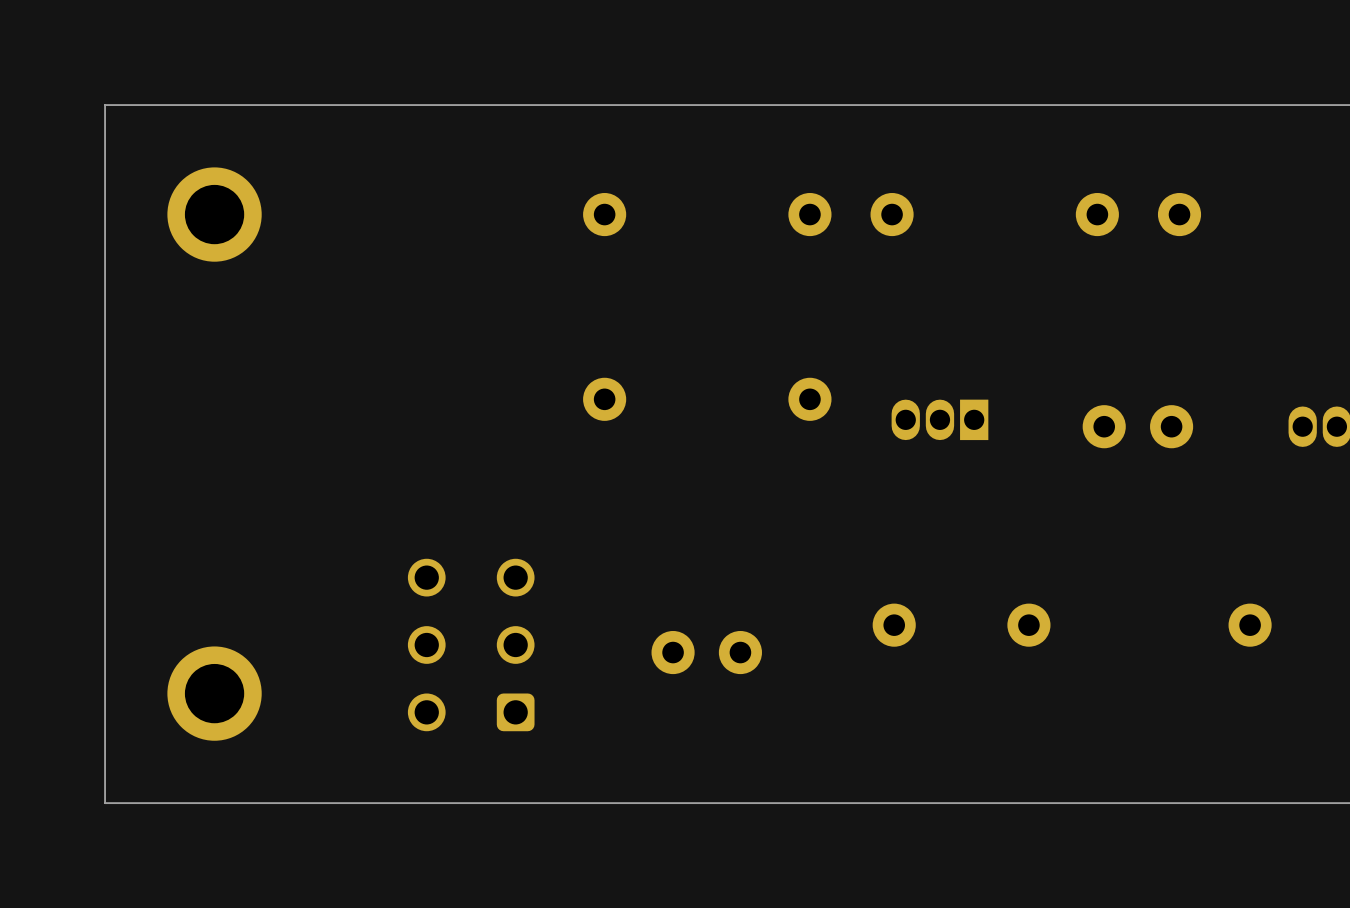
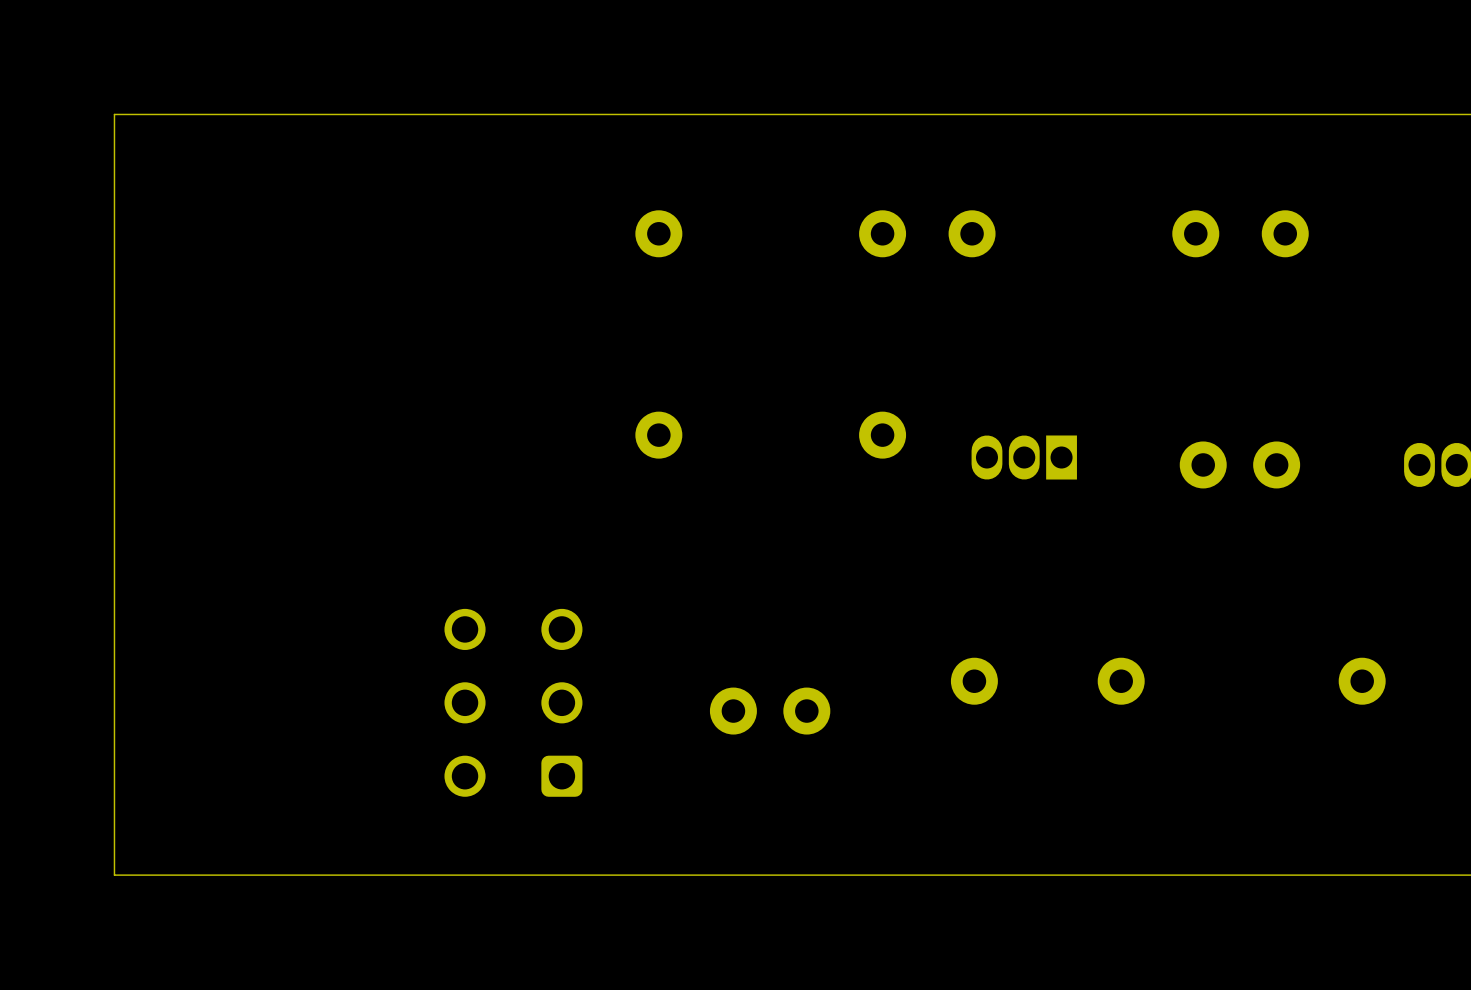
part: (214, 214) -> none
part: (214, 693) -> none

